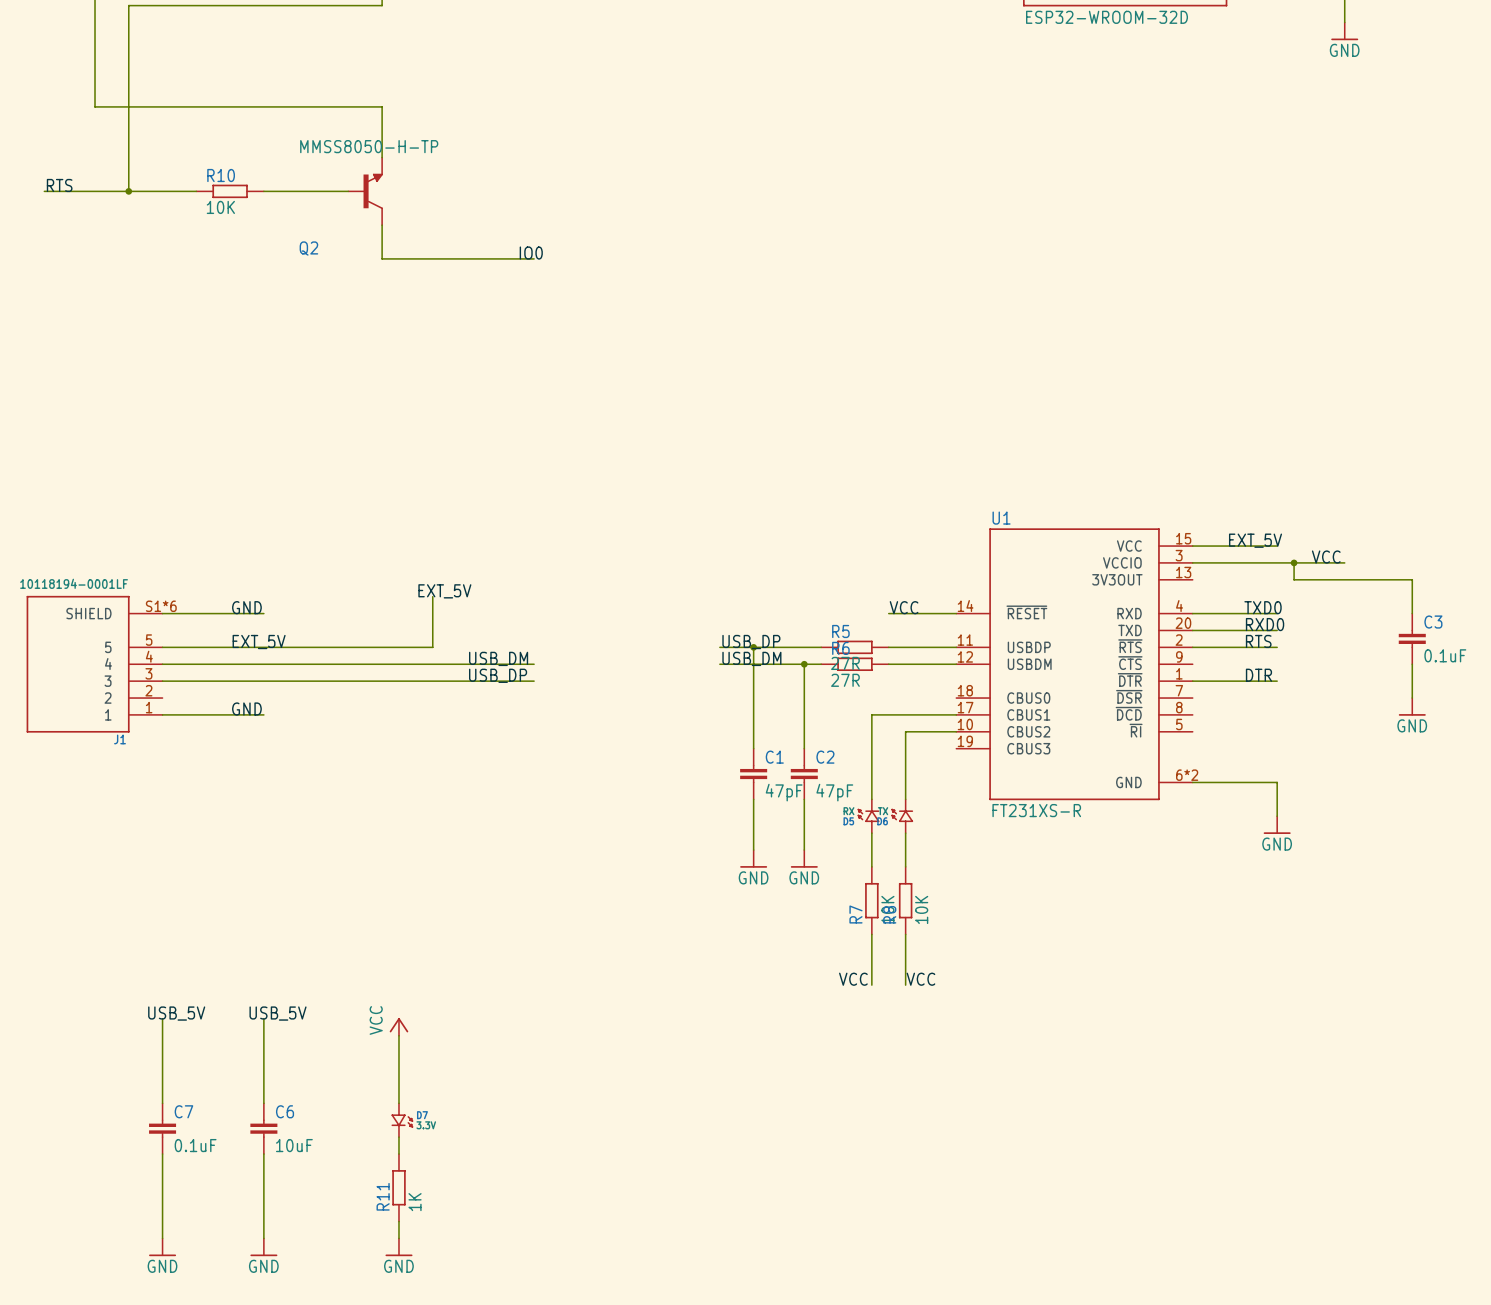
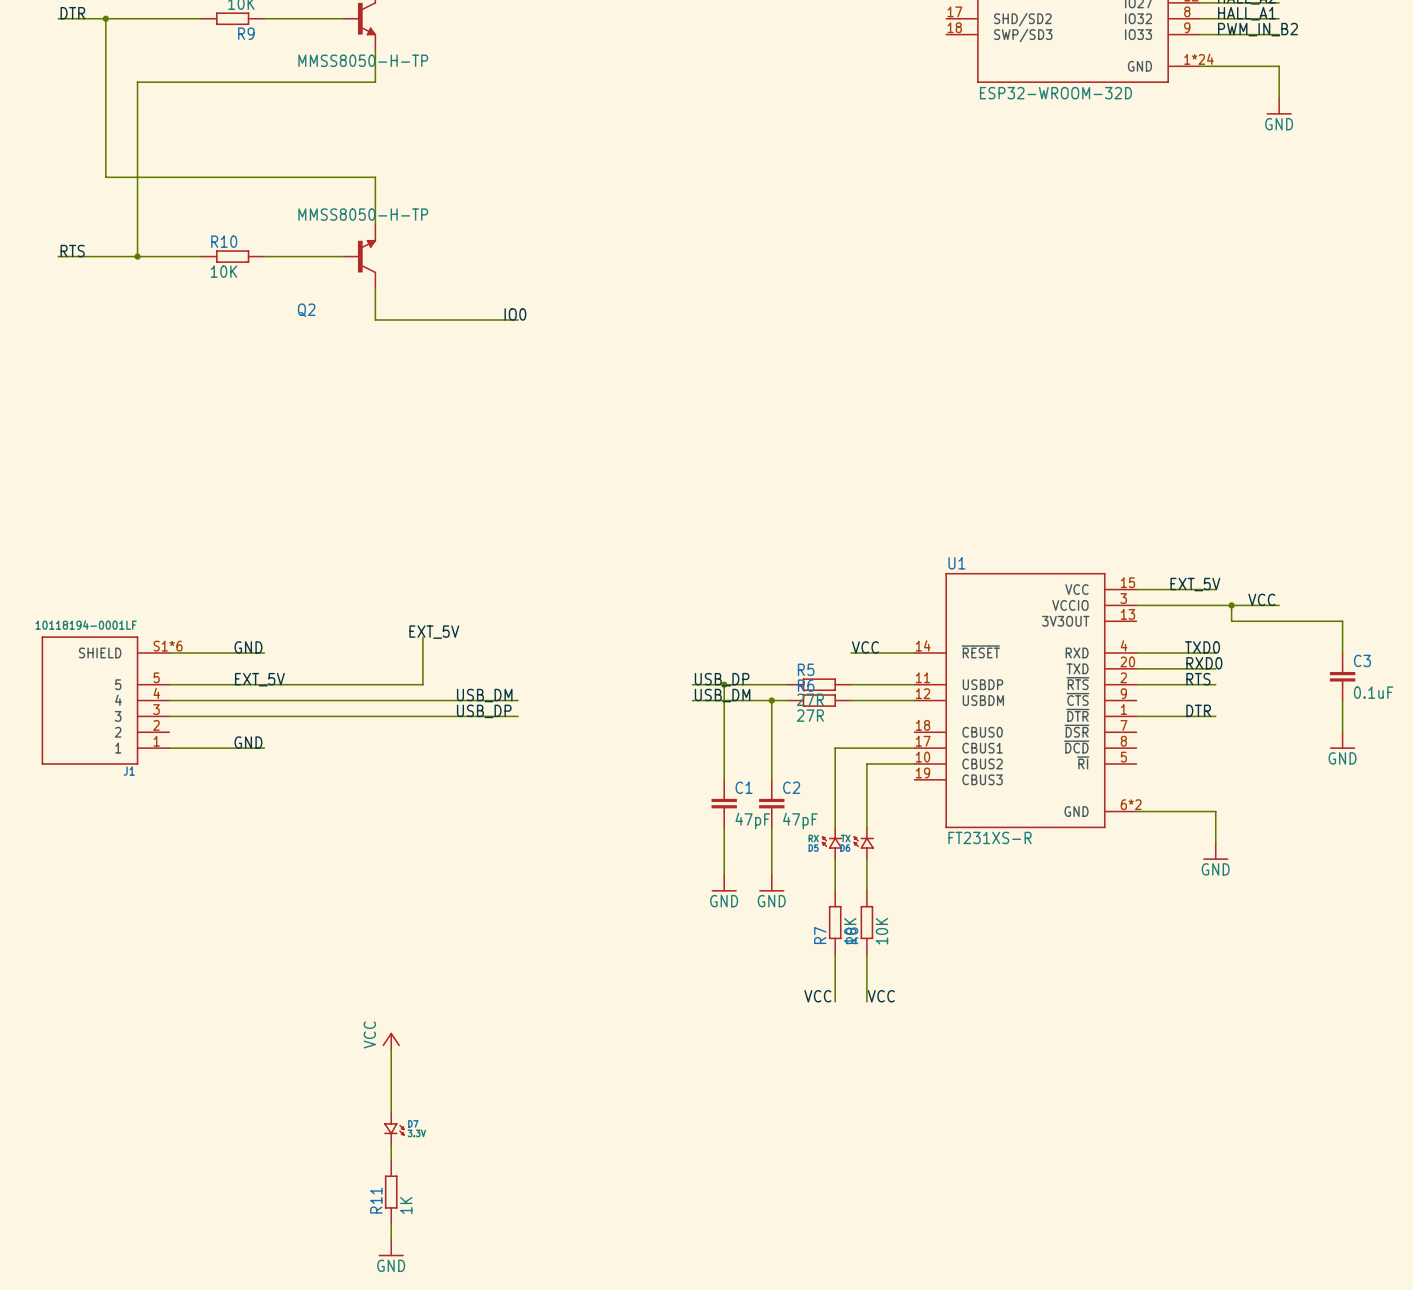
label: USB_5V (176, 1013) -> none
label: USB_5V (278, 1013) -> none
wire: (162, 1018) (162, 1103) -> none
wire: (263, 1018) (263, 1103) -> none
C7: 0.1uF (162, 1128) -> none
C6: 10uF (263, 1128) -> none
wire: (162, 1154) (162, 1238) -> none
wire: (263, 1154) (263, 1238) -> none
power symbol: GND (162, 1247) -> none
power symbol: GND (263, 1247) -> none

